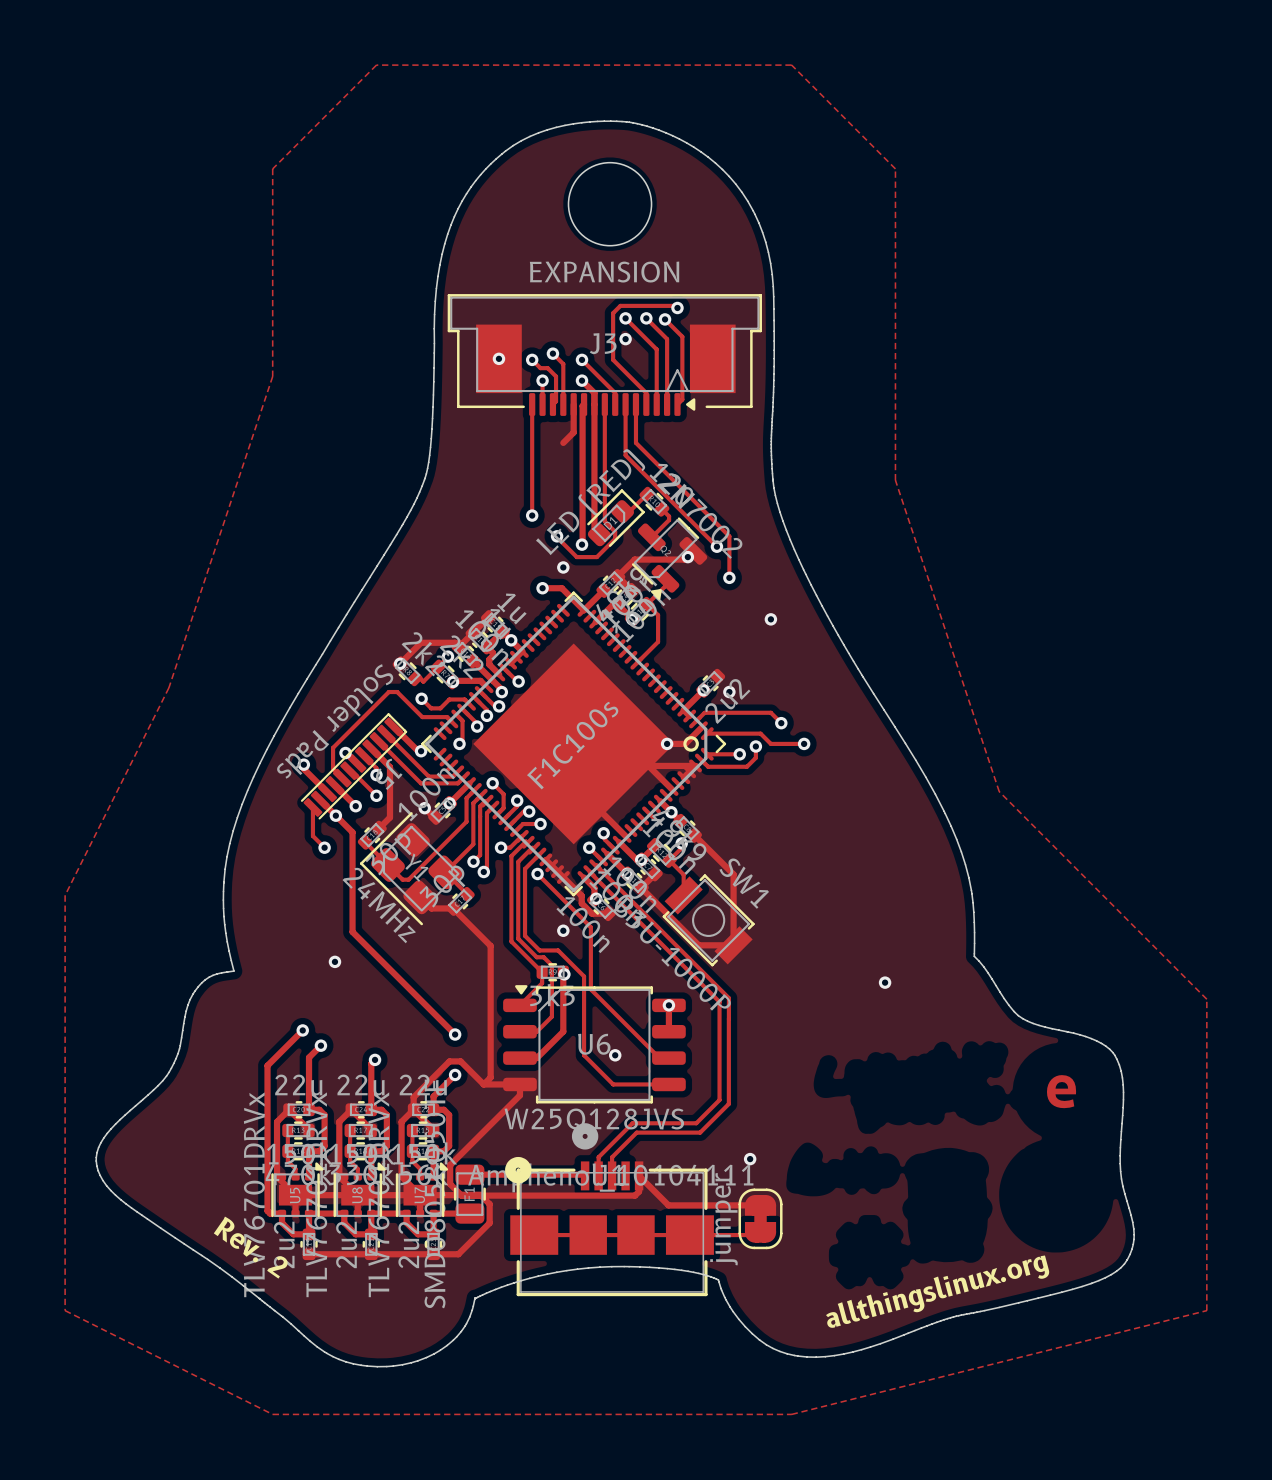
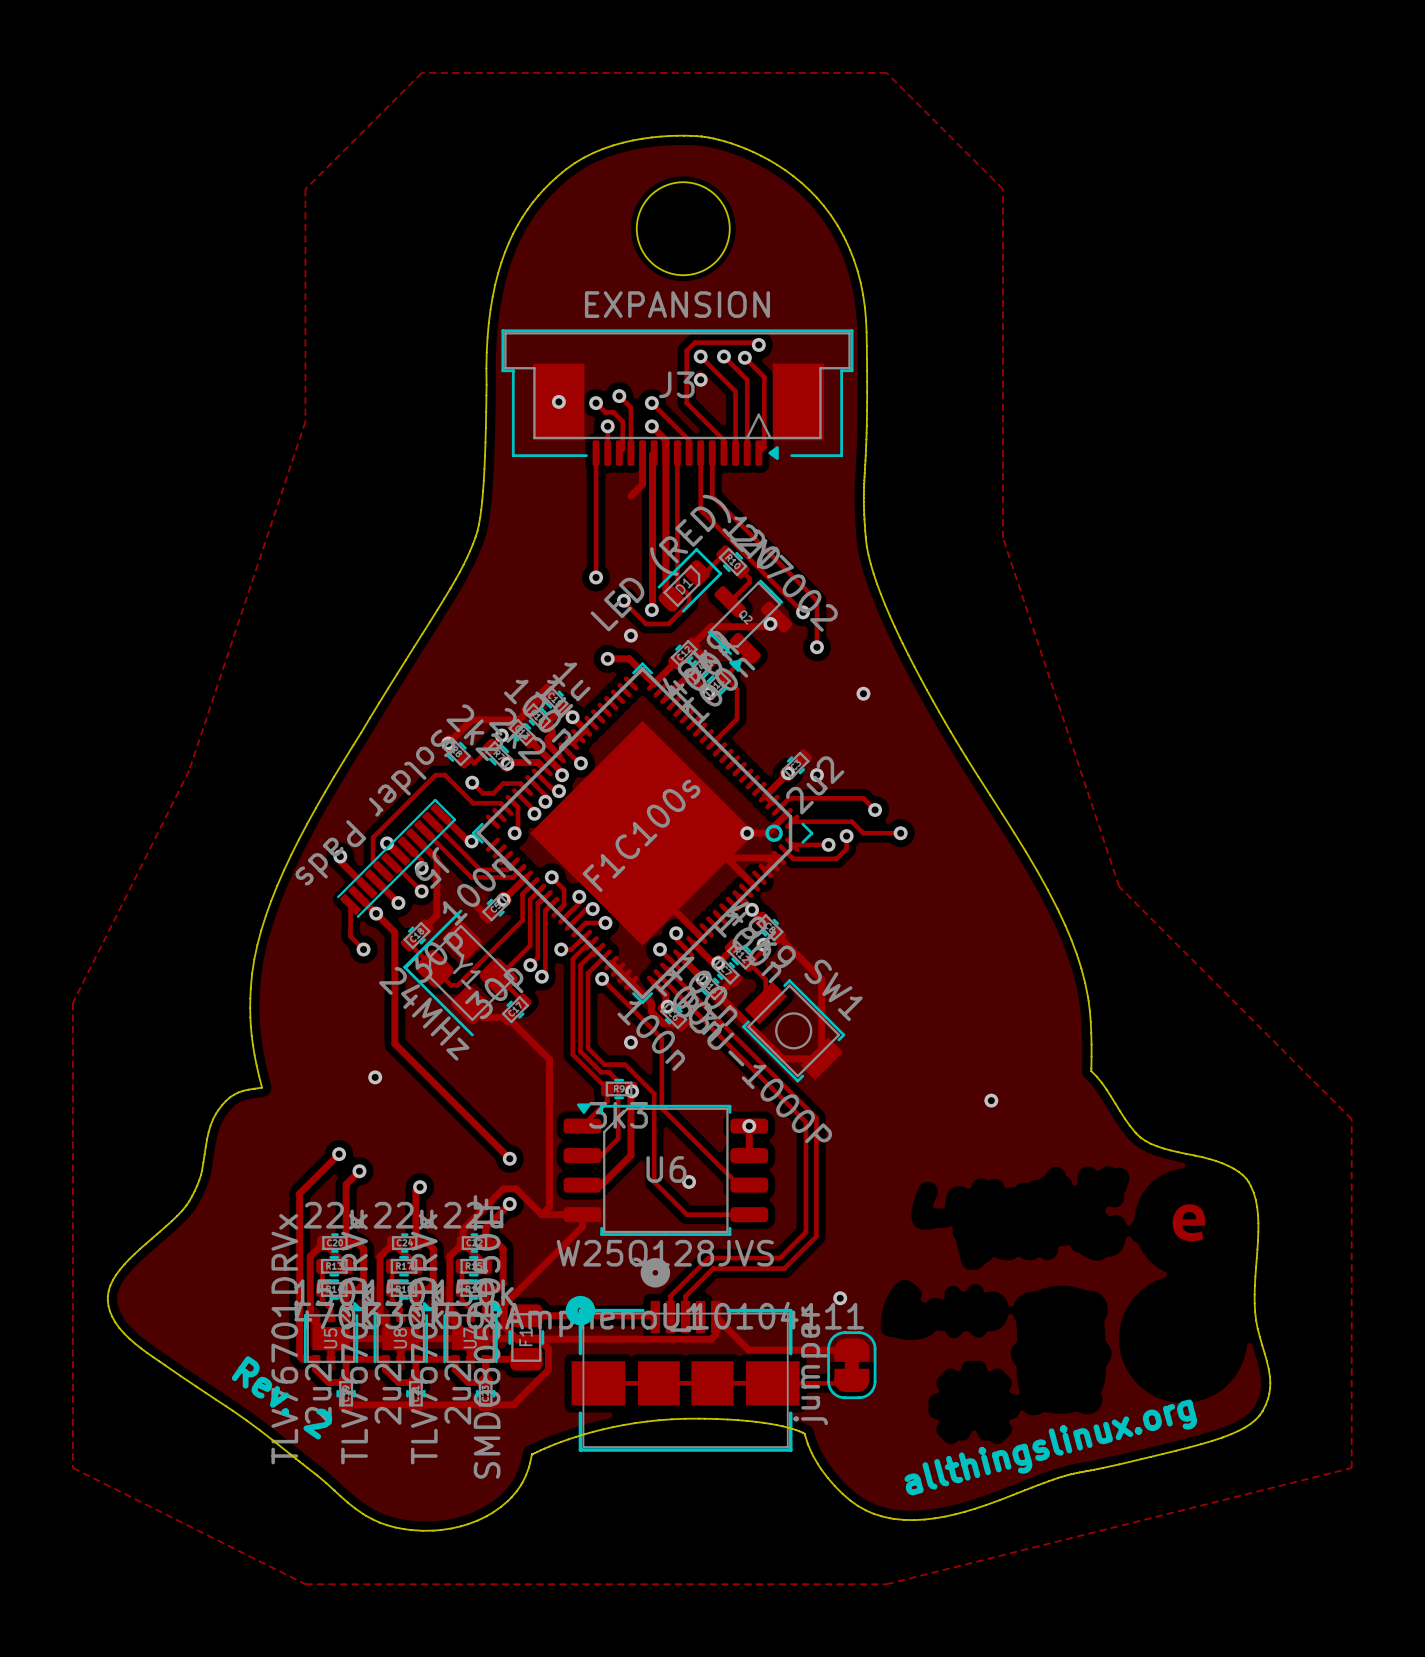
via: (424, 808) -> none

